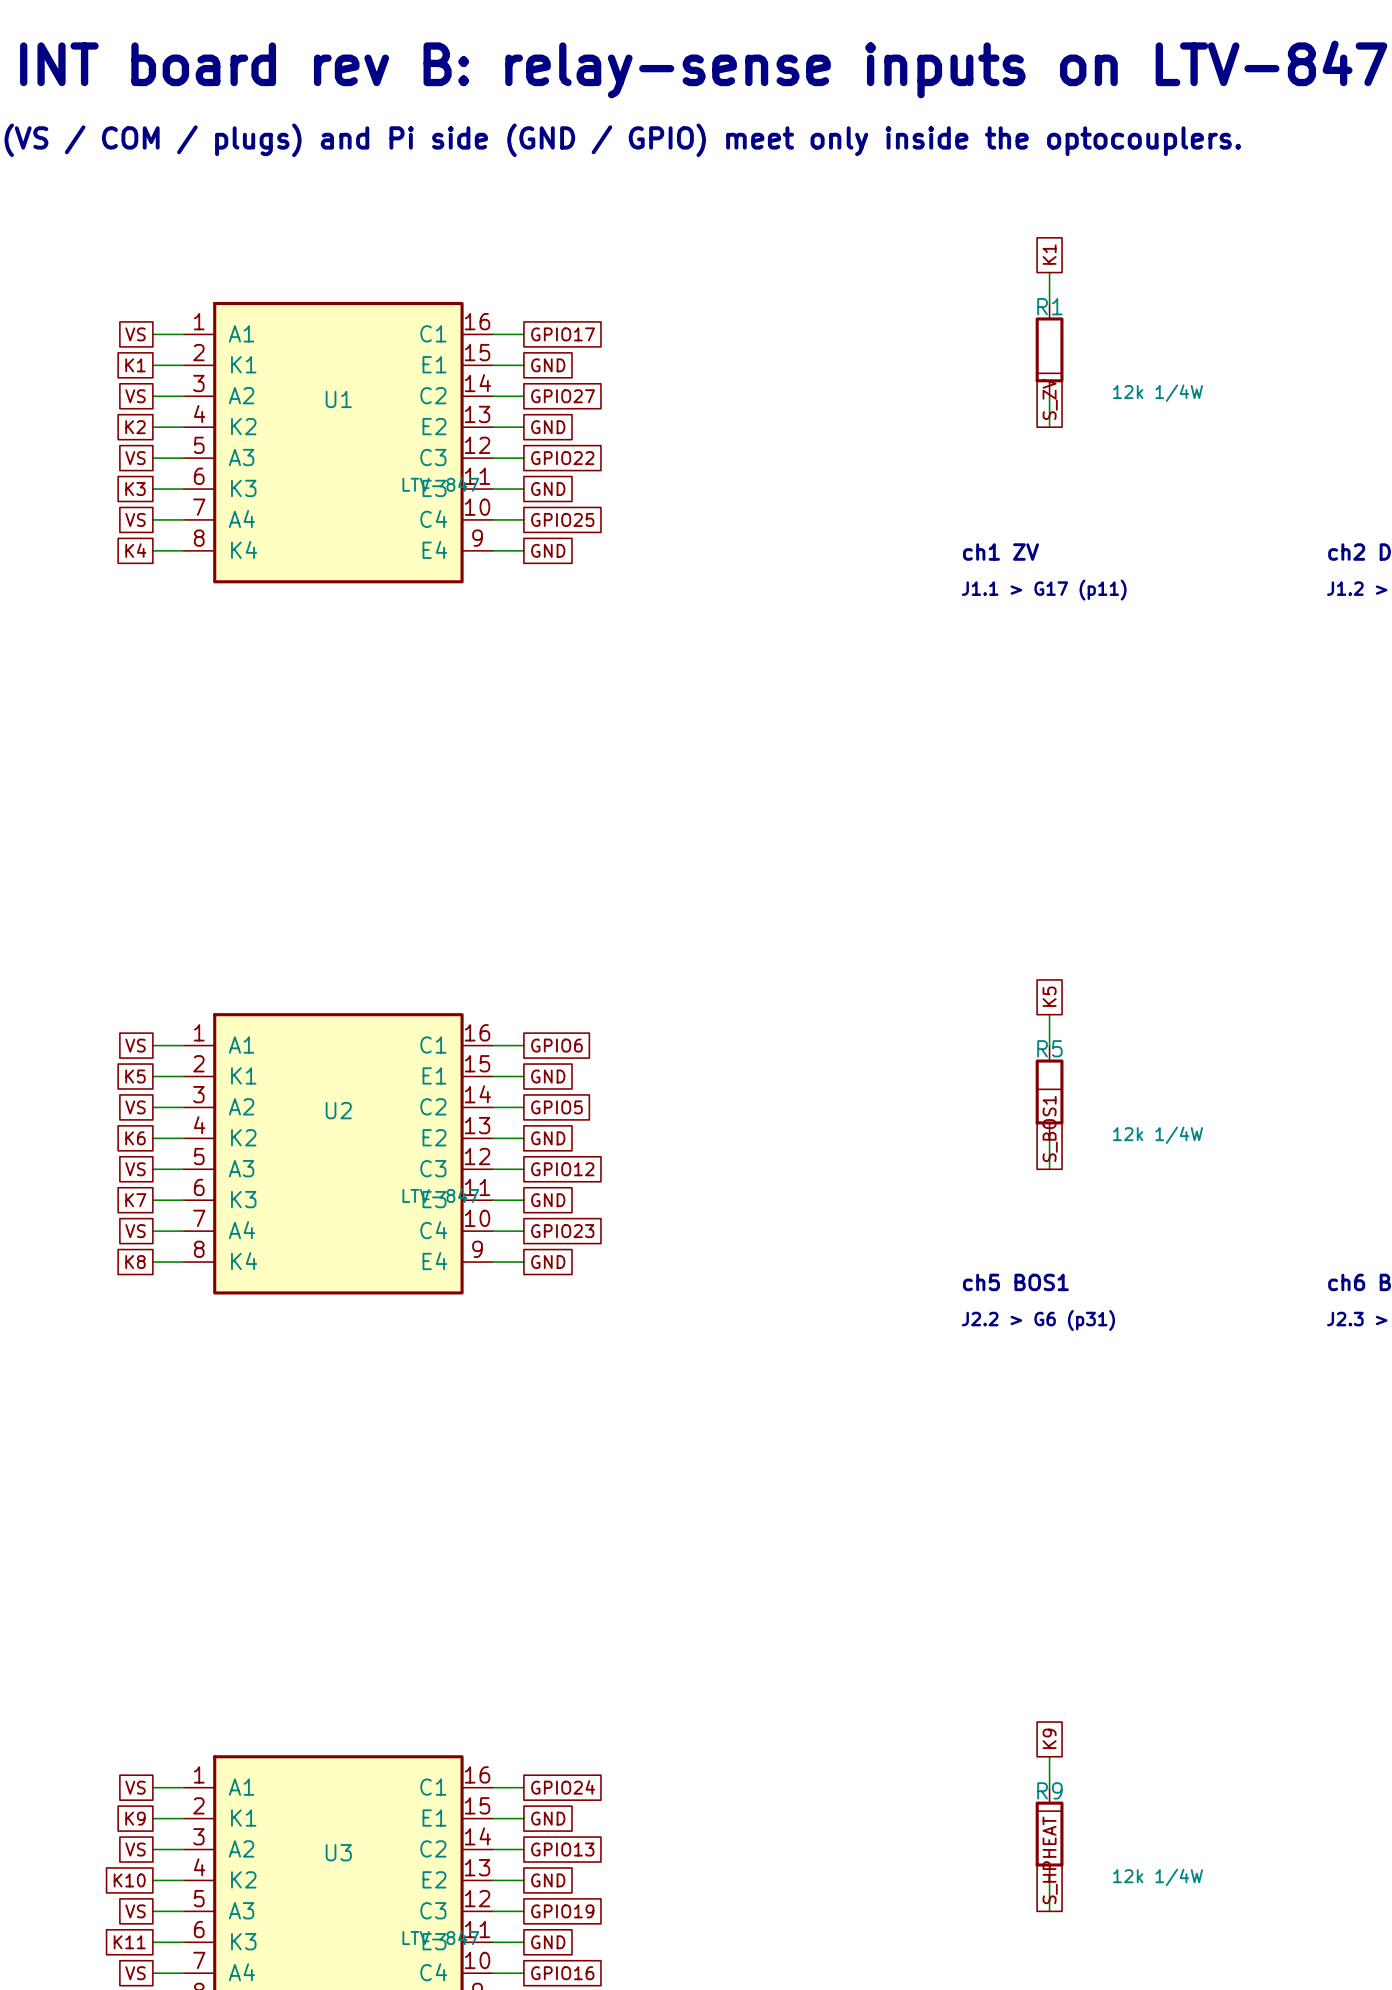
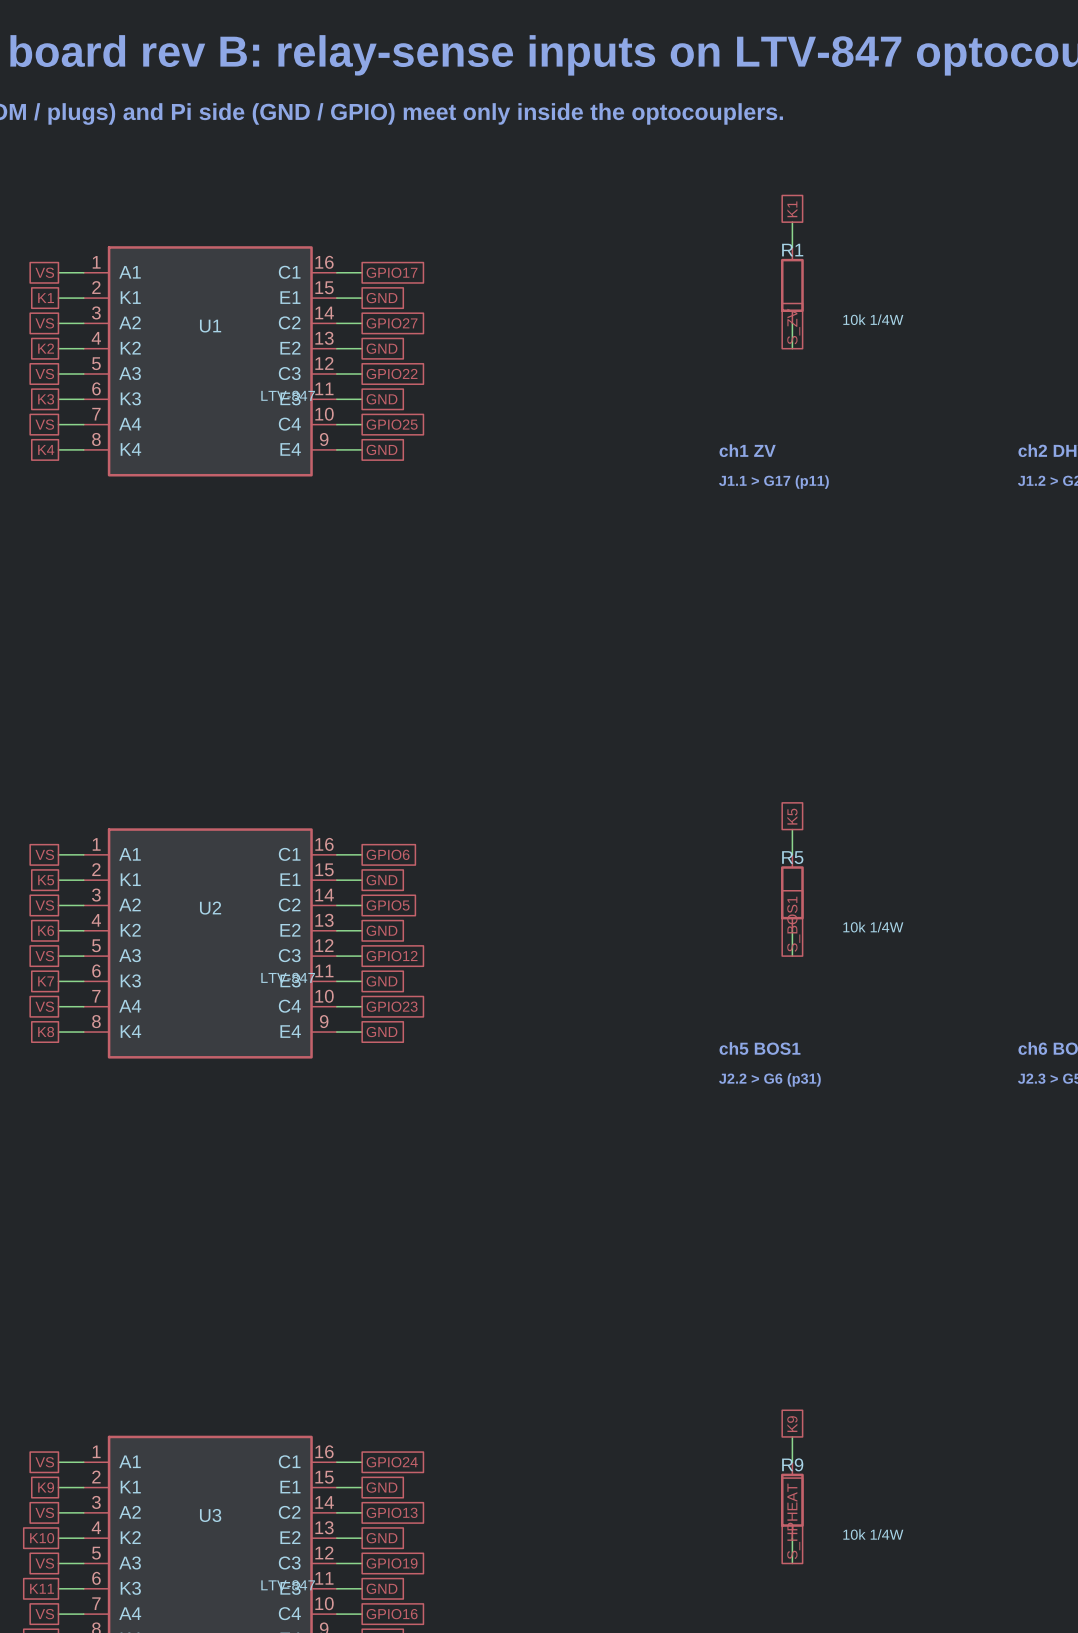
R1 value: 12k 1/4W (1158, 393) -> 10k 1/4W (873, 319)
R5 value: 12k 1/4W (1158, 1135) -> 10k 1/4W (873, 927)
R9 value: 12k 1/4W (1158, 1877) -> 10k 1/4W (873, 1534)

